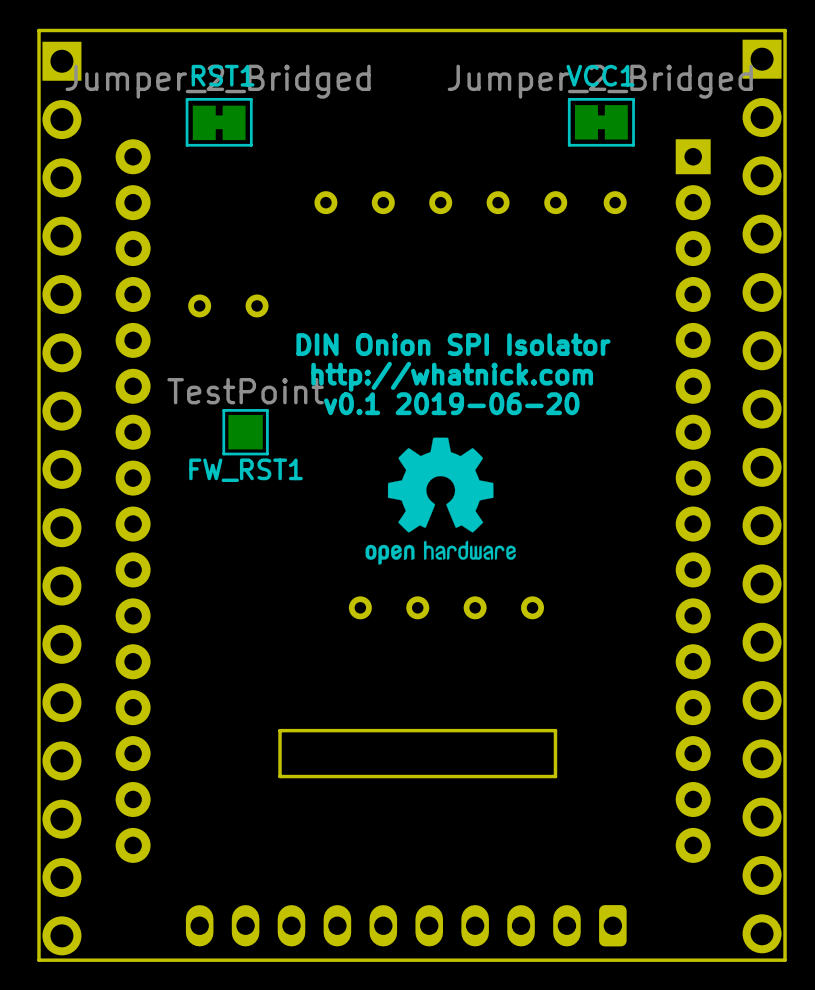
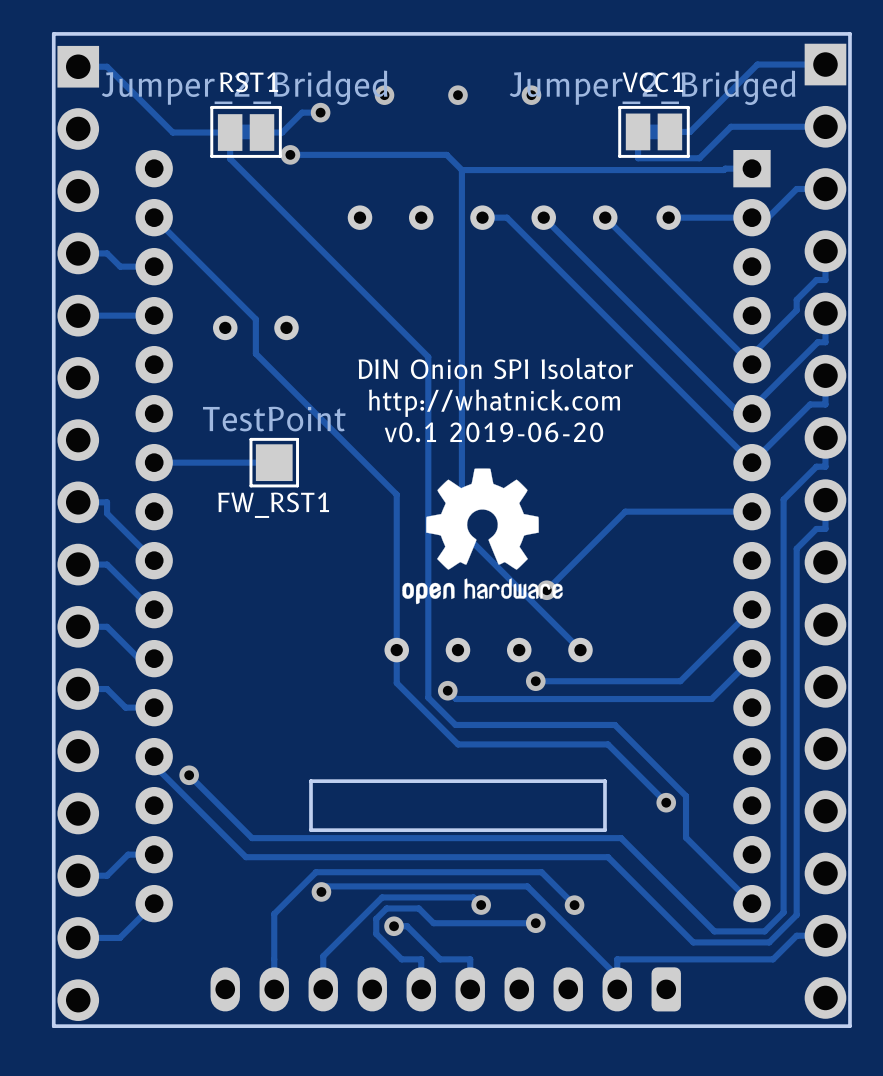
track: none -> (825, 64) (757, 64) (690, 131) (669, 131)
track: none -> (78, 66) (107, 66) (172, 132) (230, 132) (230, 158) (428, 357) (428, 697) (455, 724) (614, 724) (686, 796) (686, 837) (751, 903)
via: none -> (384, 95)
via: none -> (457, 95)
via: none -> (531, 95)
track: none -> (320, 112) (302, 112) (282, 132) (261, 132)
via: none -> (320, 112)
track: none -> (825, 126) (730, 126) (699, 158) (638, 158) (638, 131)
track: none -> (290, 154) (446, 154) (461, 170)
via: none -> (290, 154)
track: none -> (751, 168) (461, 170)
track: none -> (461, 170) (461, 531) (580, 650)
track: none -> (825, 189) (796, 189) (768, 217) (668, 217)
track: none -> (154, 217) (255, 319) (255, 353) (396, 494) (396, 683) (458, 744) (607, 744) (666, 802)
track: none -> (482, 217) (506, 217) (751, 462) (810, 404) (825, 404) (825, 375)
track: none -> (543, 217) (734, 408) (751, 408)
track: none -> (605, 217) (751, 364)
track: none -> (825, 251) (825, 280) (816, 280) (796, 299) (796, 310) (747, 359)
track: none -> (78, 253) (107, 253) (120, 266) (154, 266)
track: none -> (825, 313) (825, 342) (817, 342) (751, 408)
track: none -> (154, 315) (78, 315)
track: none -> (825, 437) (825, 466) (816, 466) (783, 499) (783, 912) (764, 931) (714, 931) (621, 838) (252, 838) (189, 775)
track: none -> (274, 462) (154, 462)
track: none -> (825, 500) (825, 528) (816, 528) (796, 548) (796, 915) (769, 942) (693, 942) (608, 857) (245, 857) (154, 765) (154, 756)
track: none -> (78, 502) (107, 502) (107, 513) (154, 560)
track: none -> (751, 511) (625, 511) (546, 590)
track: none -> (78, 564) (107, 564) (154, 609)
via: none -> (546, 590)
track: none -> (751, 609) (680, 681) (535, 681)
track: none -> (78, 626) (107, 626) (138, 658) (154, 658)
track: none -> (751, 658) (711, 699) (456, 699) (447, 690)
via: none -> (535, 681)
track: none -> (78, 689) (107, 689) (125, 707) (154, 707)
via: none -> (447, 690)
via: none -> (189, 775)
via: none -> (666, 802)
track: none -> (154, 854) (128, 854) (107, 875) (78, 875)
track: none -> (321, 891) (326, 886) (527, 886) (617, 976)
via: none -> (321, 891)
track: none -> (154, 903) (119, 937) (78, 937)
track: none -> (481, 905) (473, 897) (382, 897) (323, 956) (323, 989)
via: none -> (481, 905)
track: none -> (574, 905) (541, 872) (316, 872) (274, 914) (274, 989)
via: none -> (574, 905)
track: none -> (535, 923) (433, 923) (418, 908) (386, 908) (376, 918) (376, 933) (401, 959) (421, 959) (421, 989)
via: none -> (535, 923)
track: none -> (394, 926) (407, 926) (440, 959) (470, 959) (470, 989)
via: none -> (394, 926)
track: none -> (825, 935) (796, 935) (773, 959) (617, 959) (617, 989)

